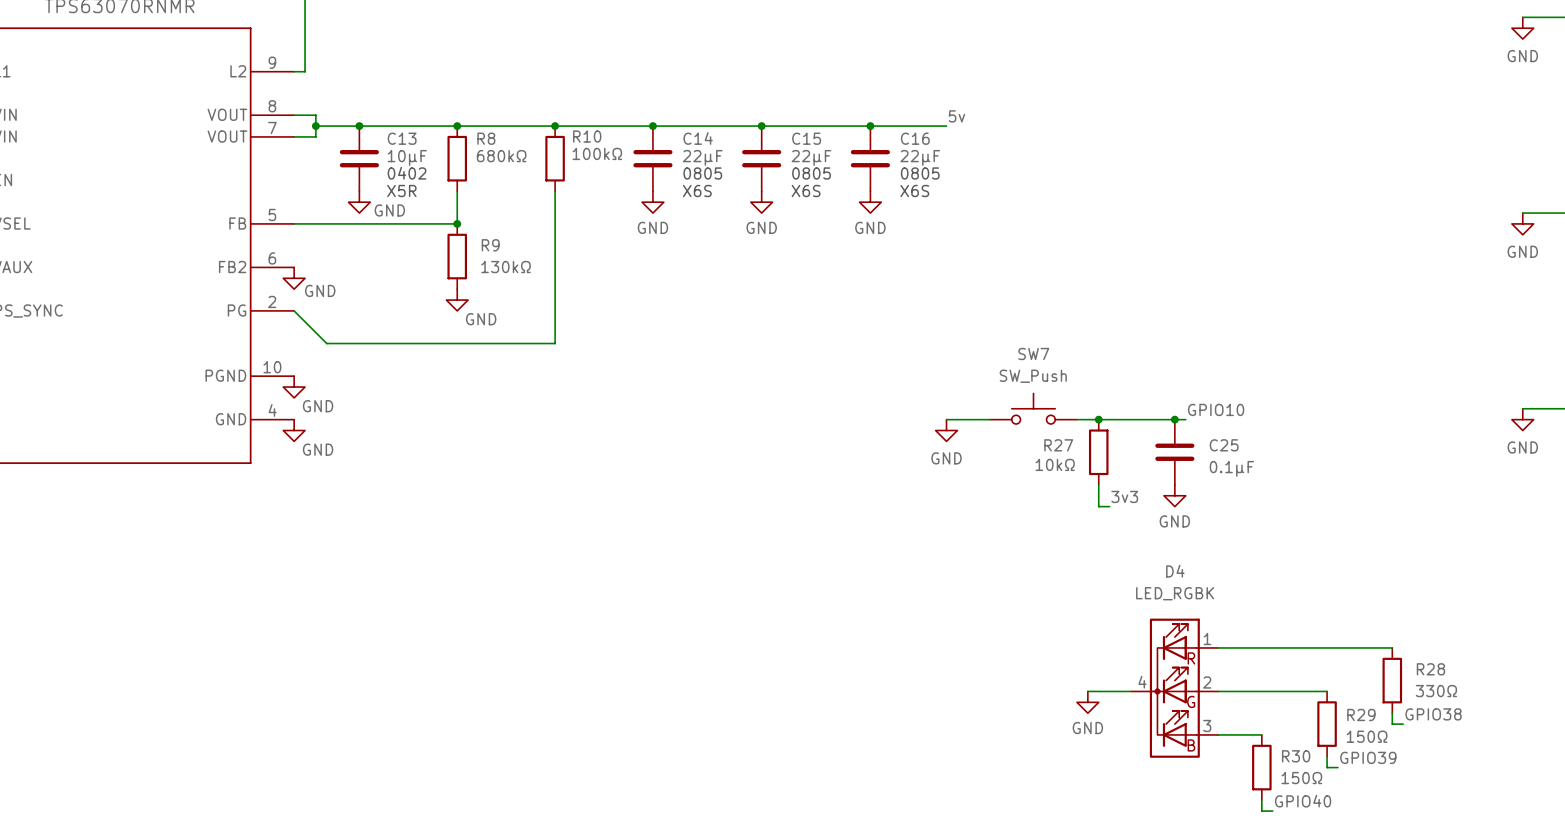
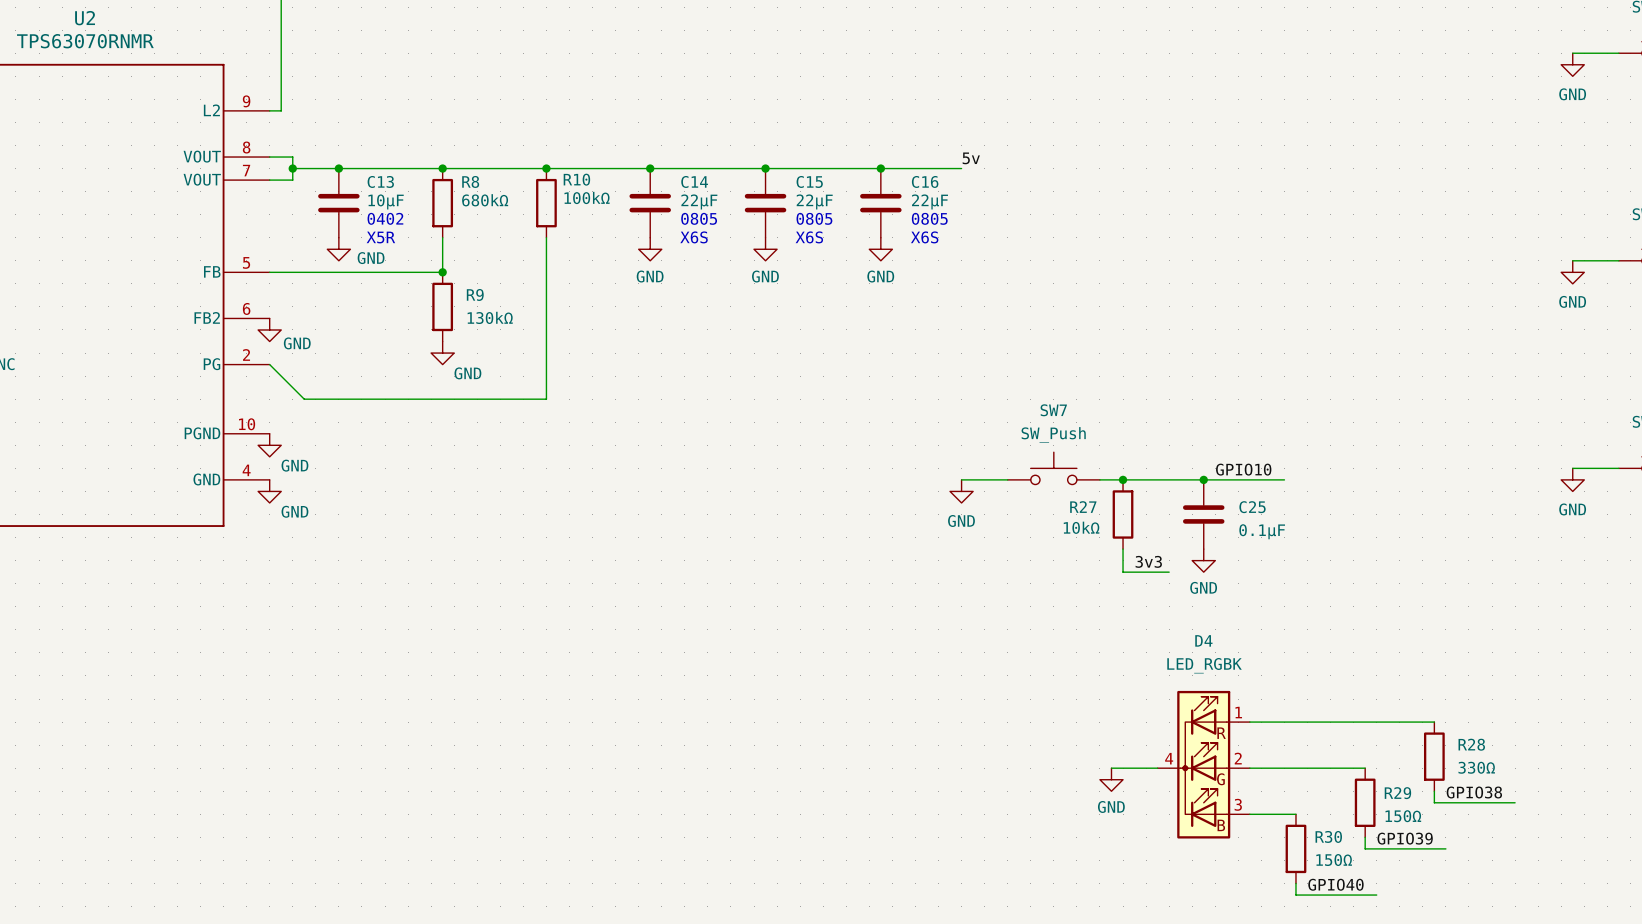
wire: none -> (1215, 479) (1284, 479)
wire: none -> (1134, 572) (1169, 572)
wire: none -> (1445, 802) (1515, 802)
wire: none -> (1376, 848) (1445, 848)
wire: none -> (1307, 895) (1376, 895)

